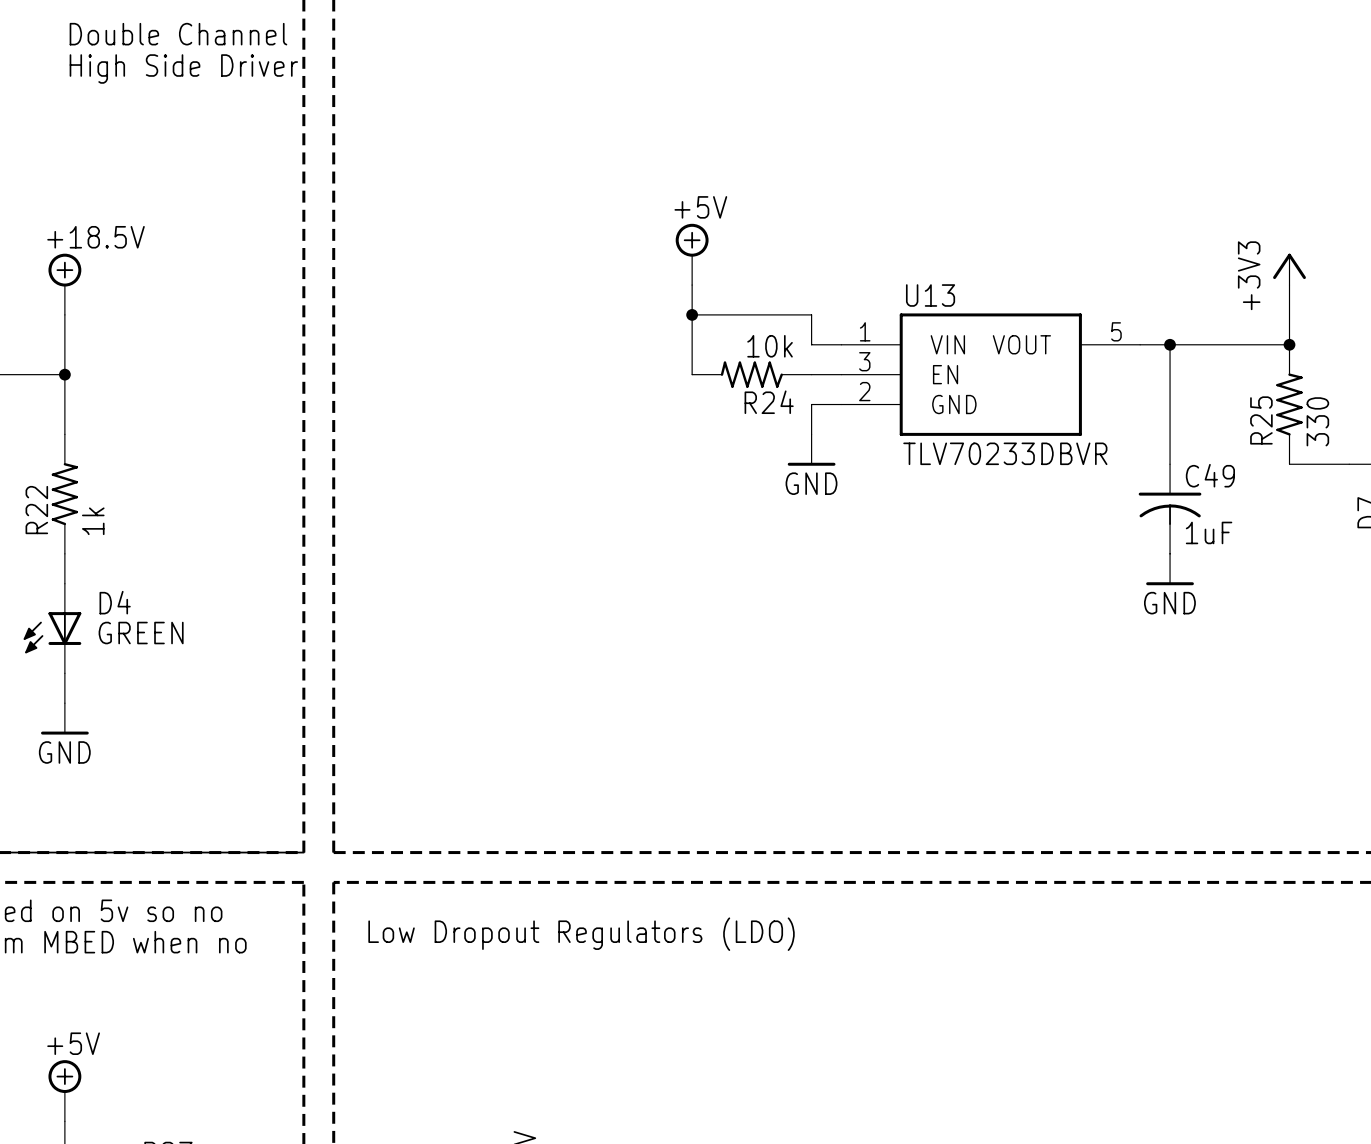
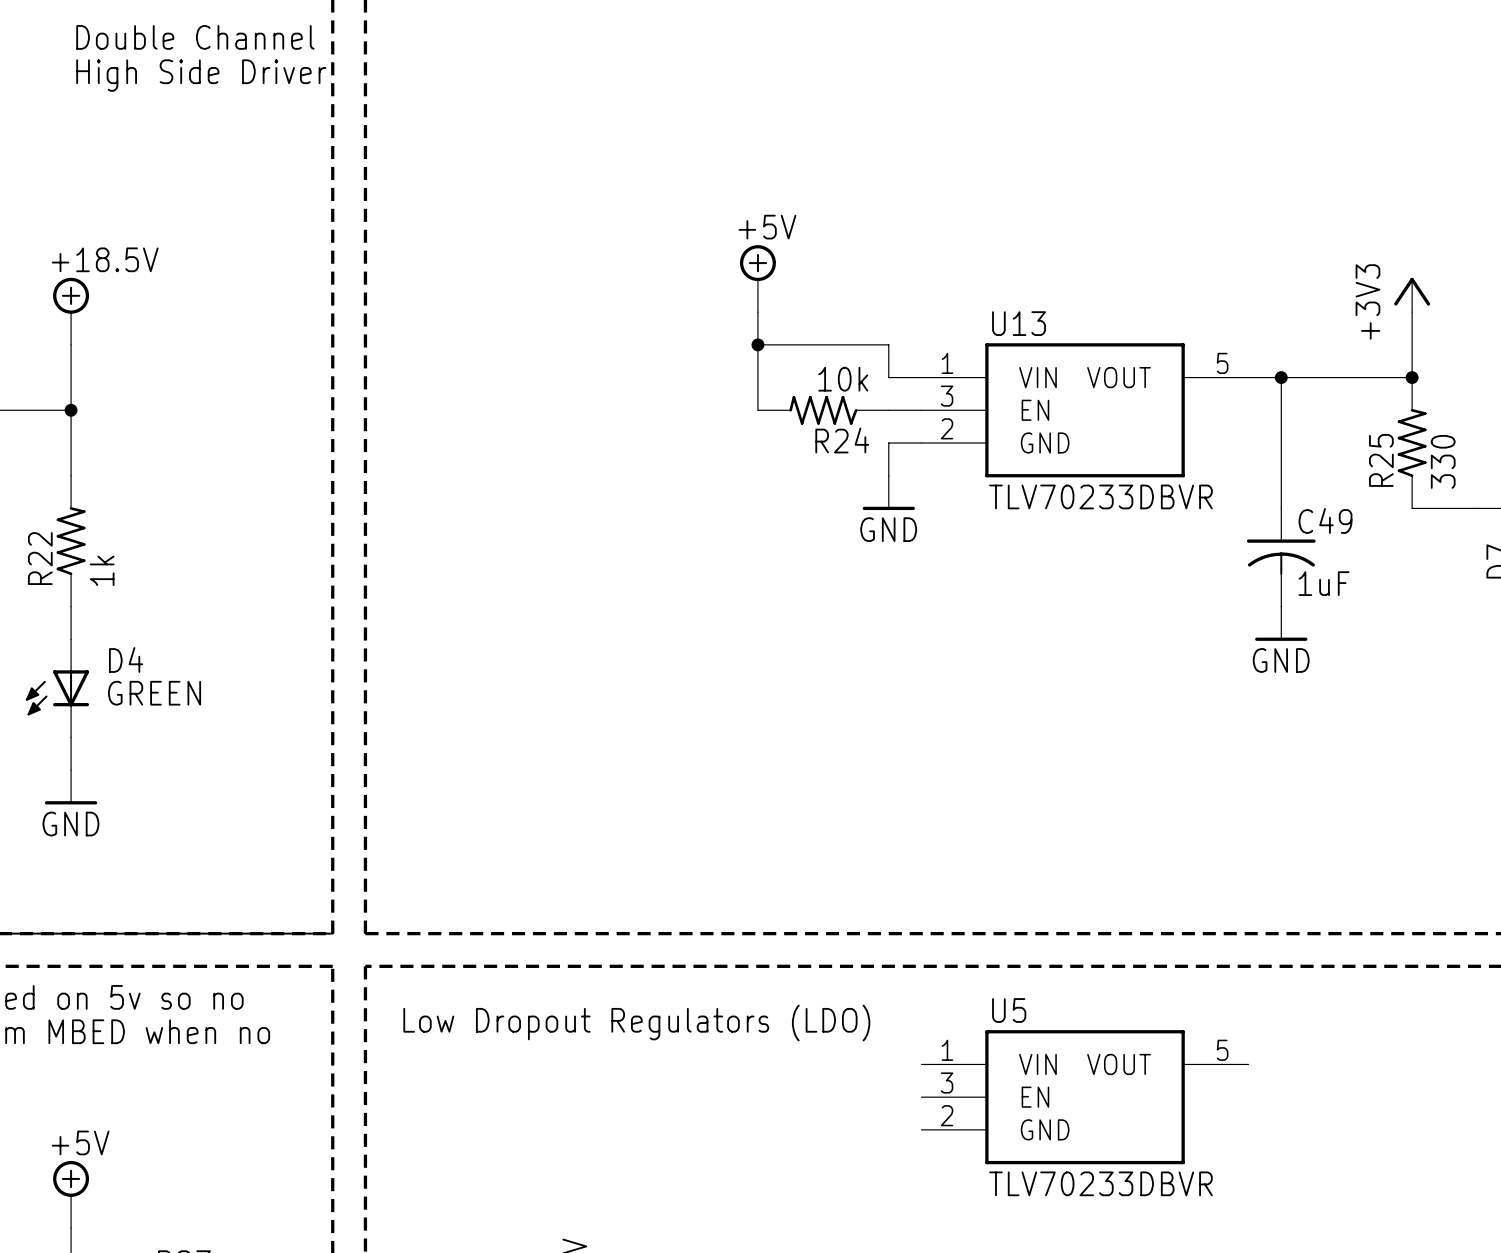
U5: none -> TLV70233DBVR (1085, 1097)

